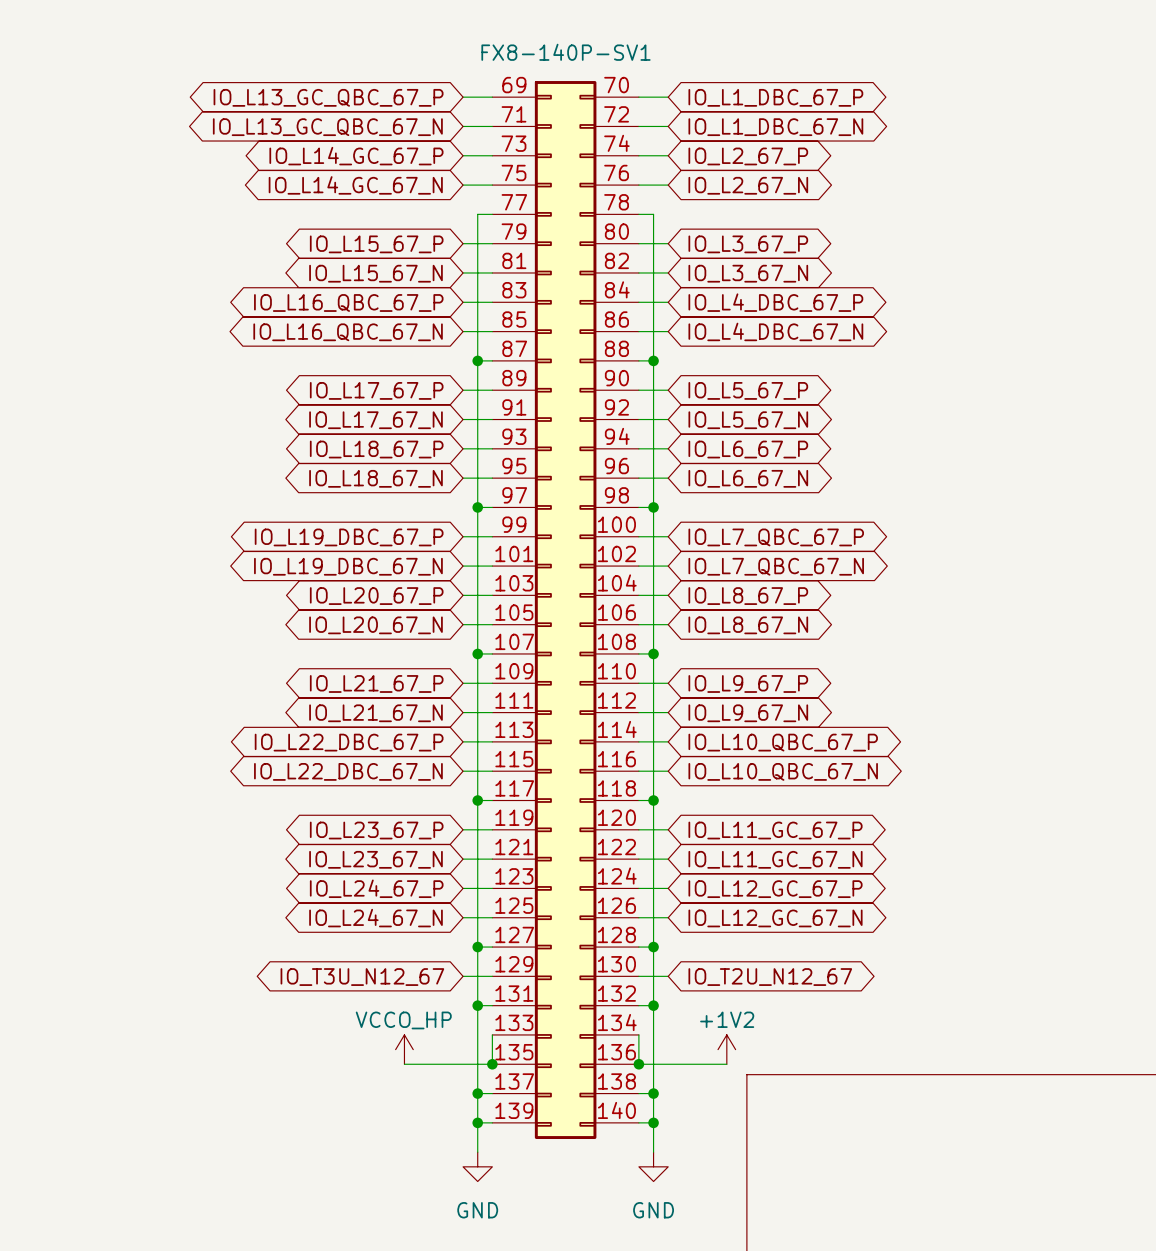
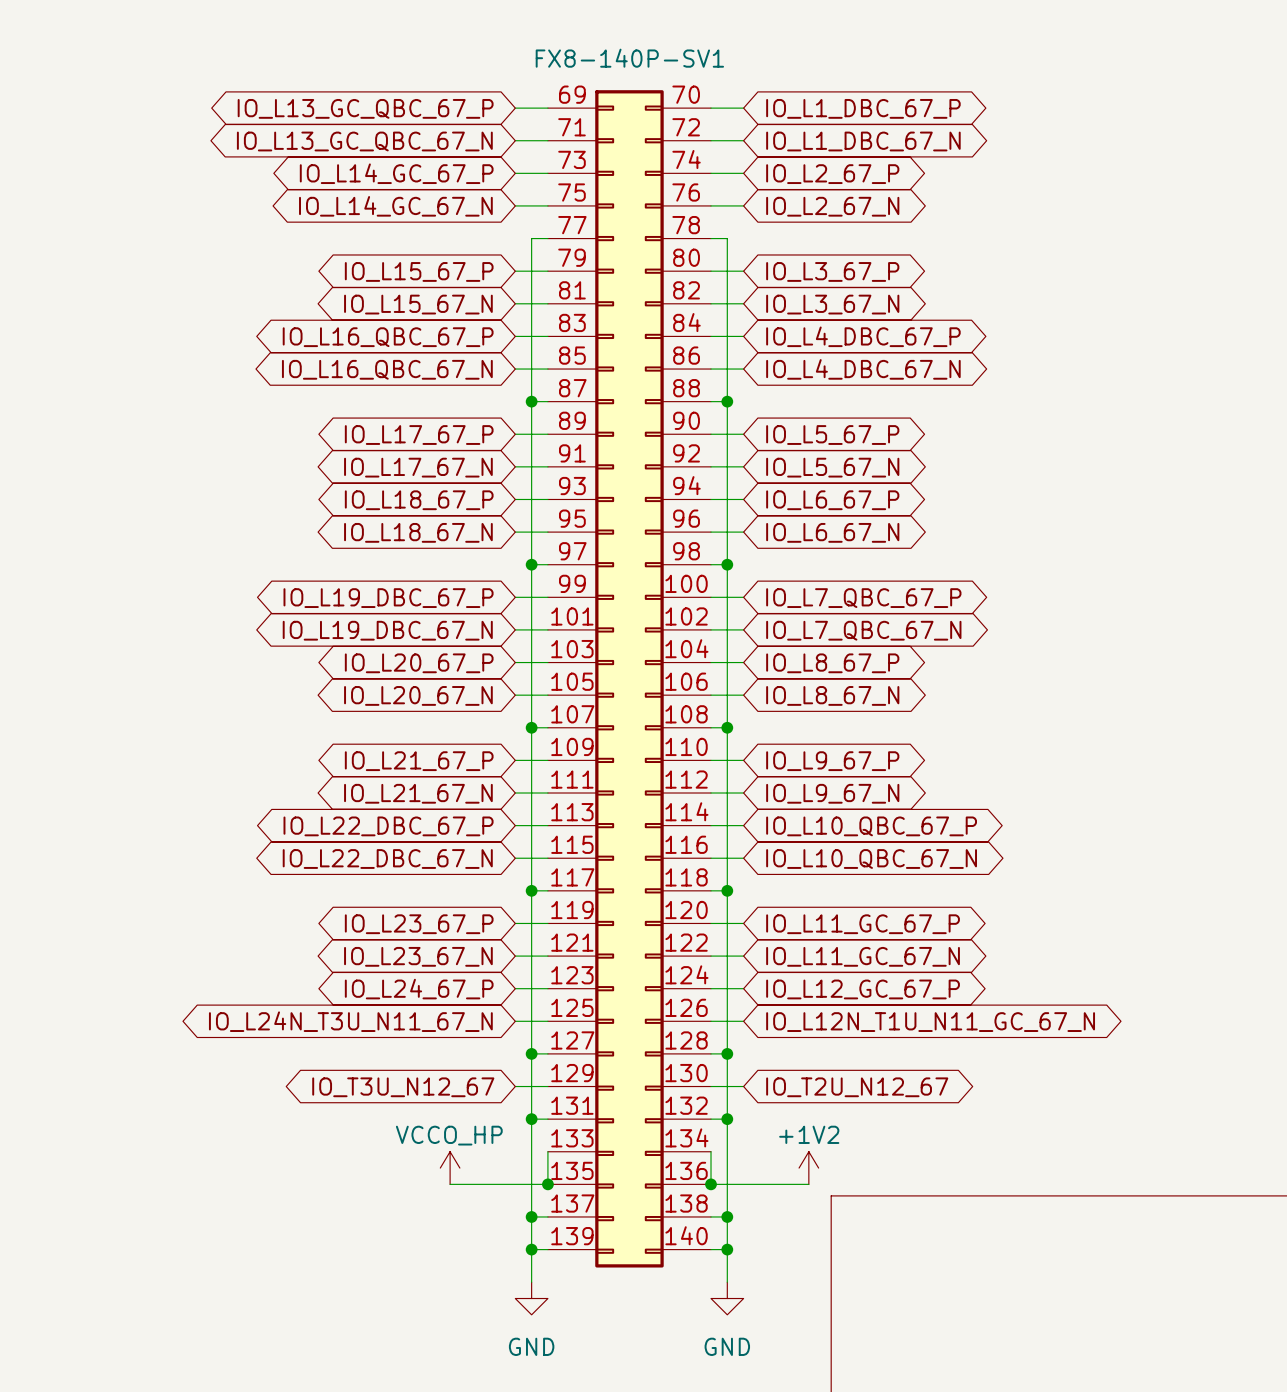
global label: IO_L24_67_N (375, 918) -> IO_L24N_T3U_N11_67_N (350, 1021)
global label: IO_L12_GC_67_N (775, 918) -> IO_L12N_T1U_N11_GC_67_N (930, 1022)

